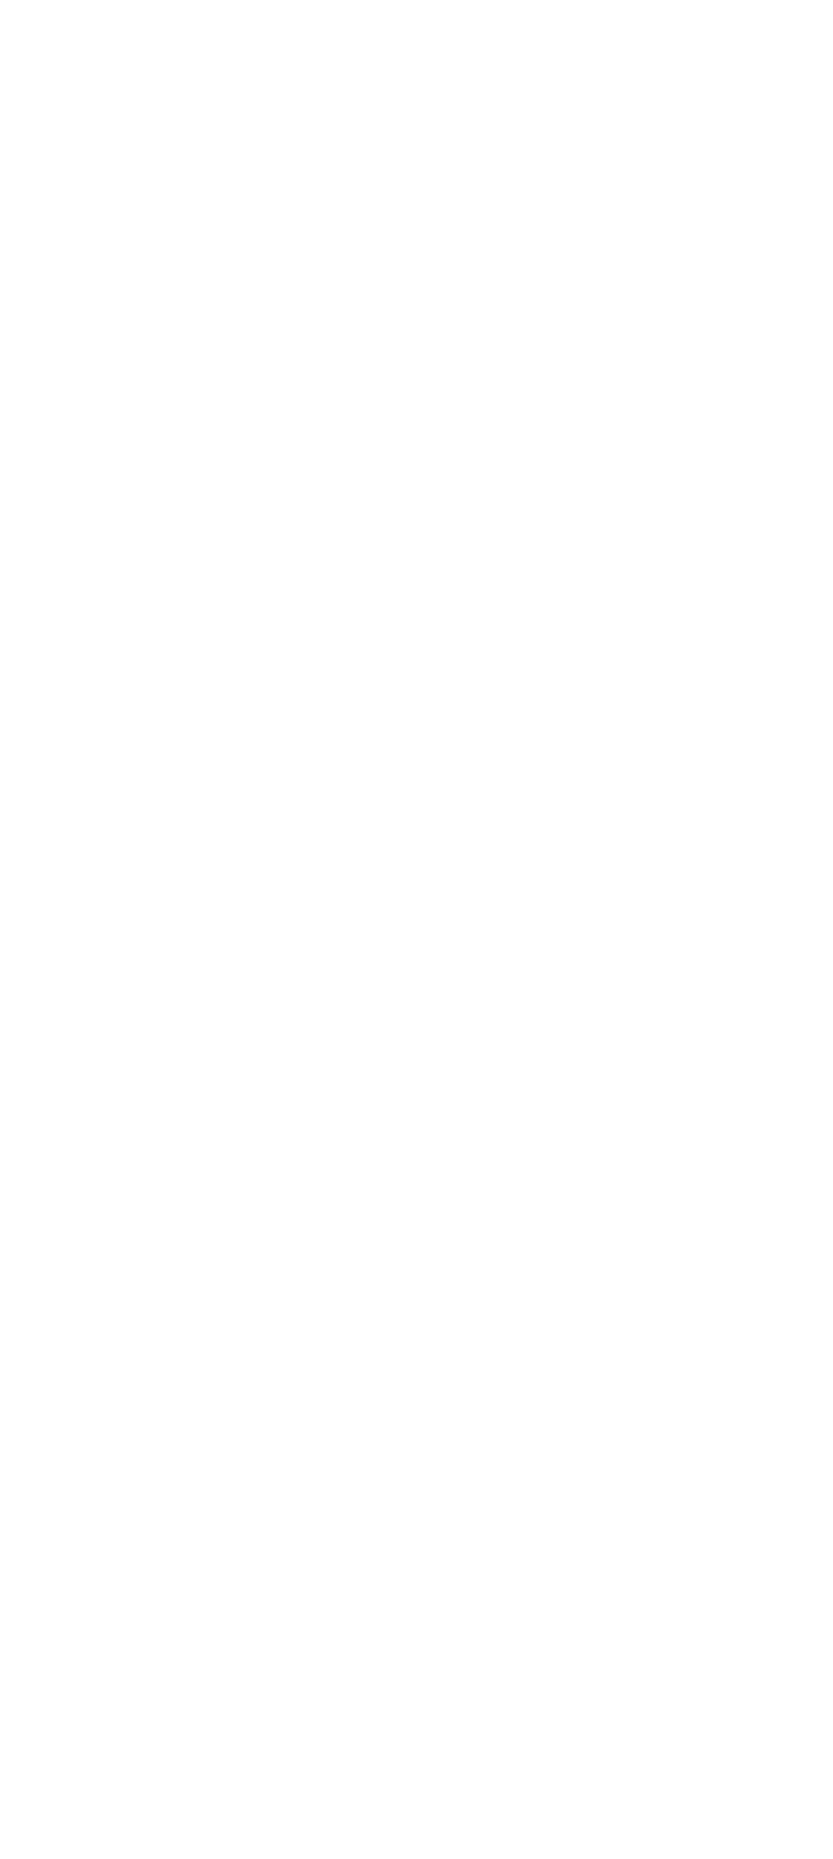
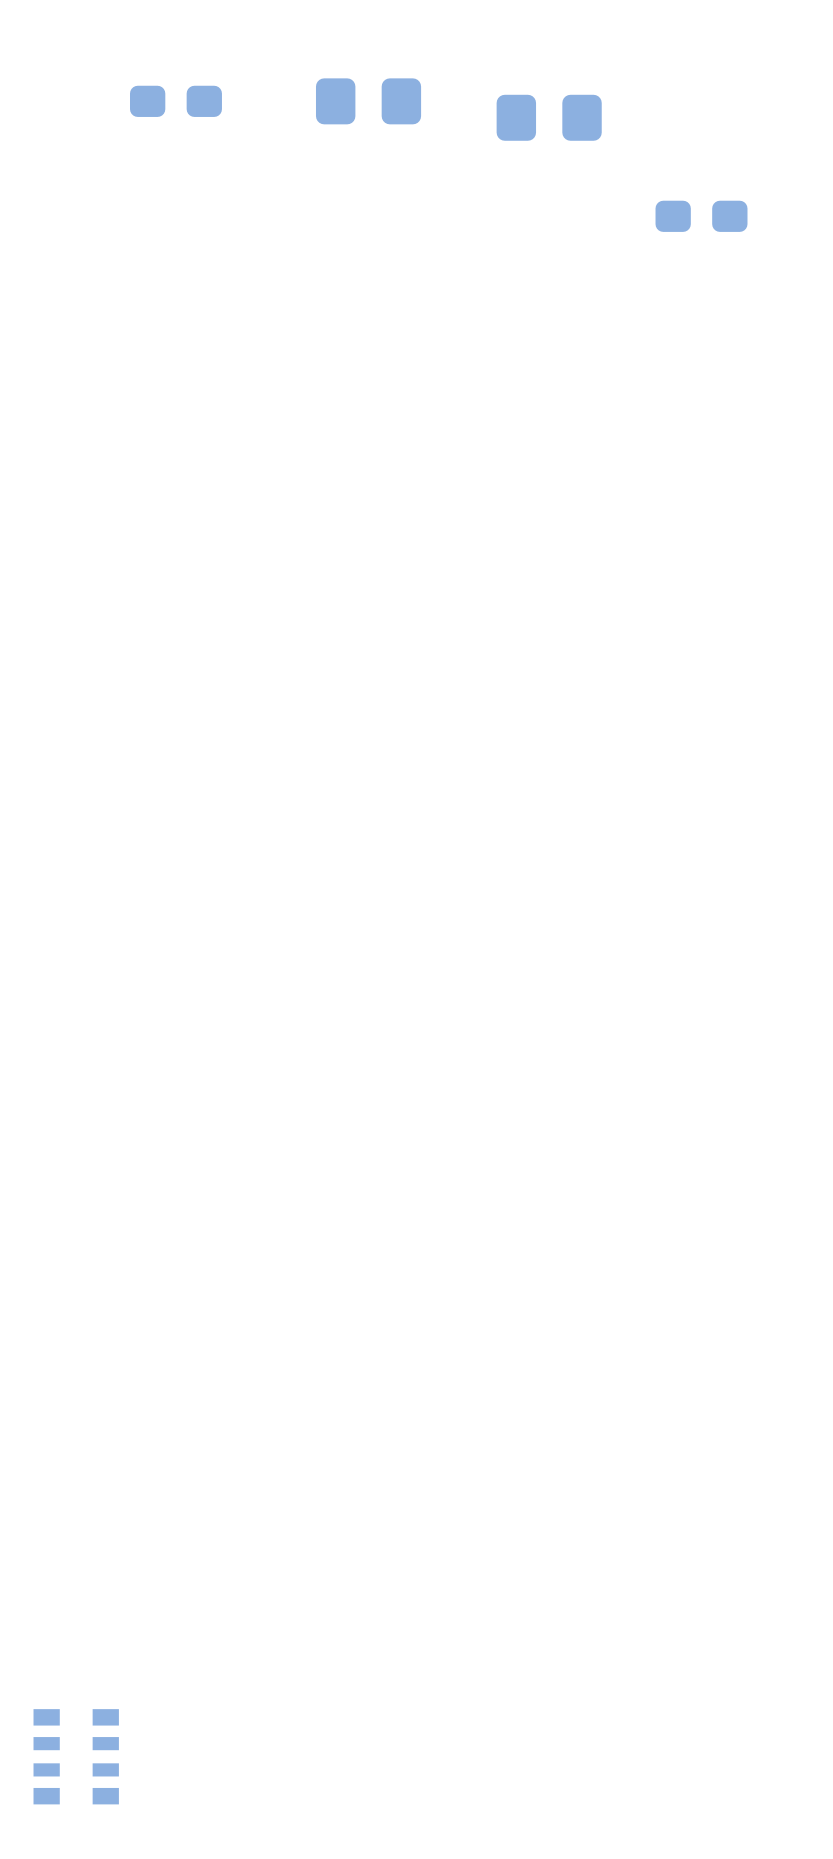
part: none -> (175, 101)
part: none -> (368, 101)
part: none -> (549, 117)
part: none -> (701, 216)
part: none -> (76, 1756)

